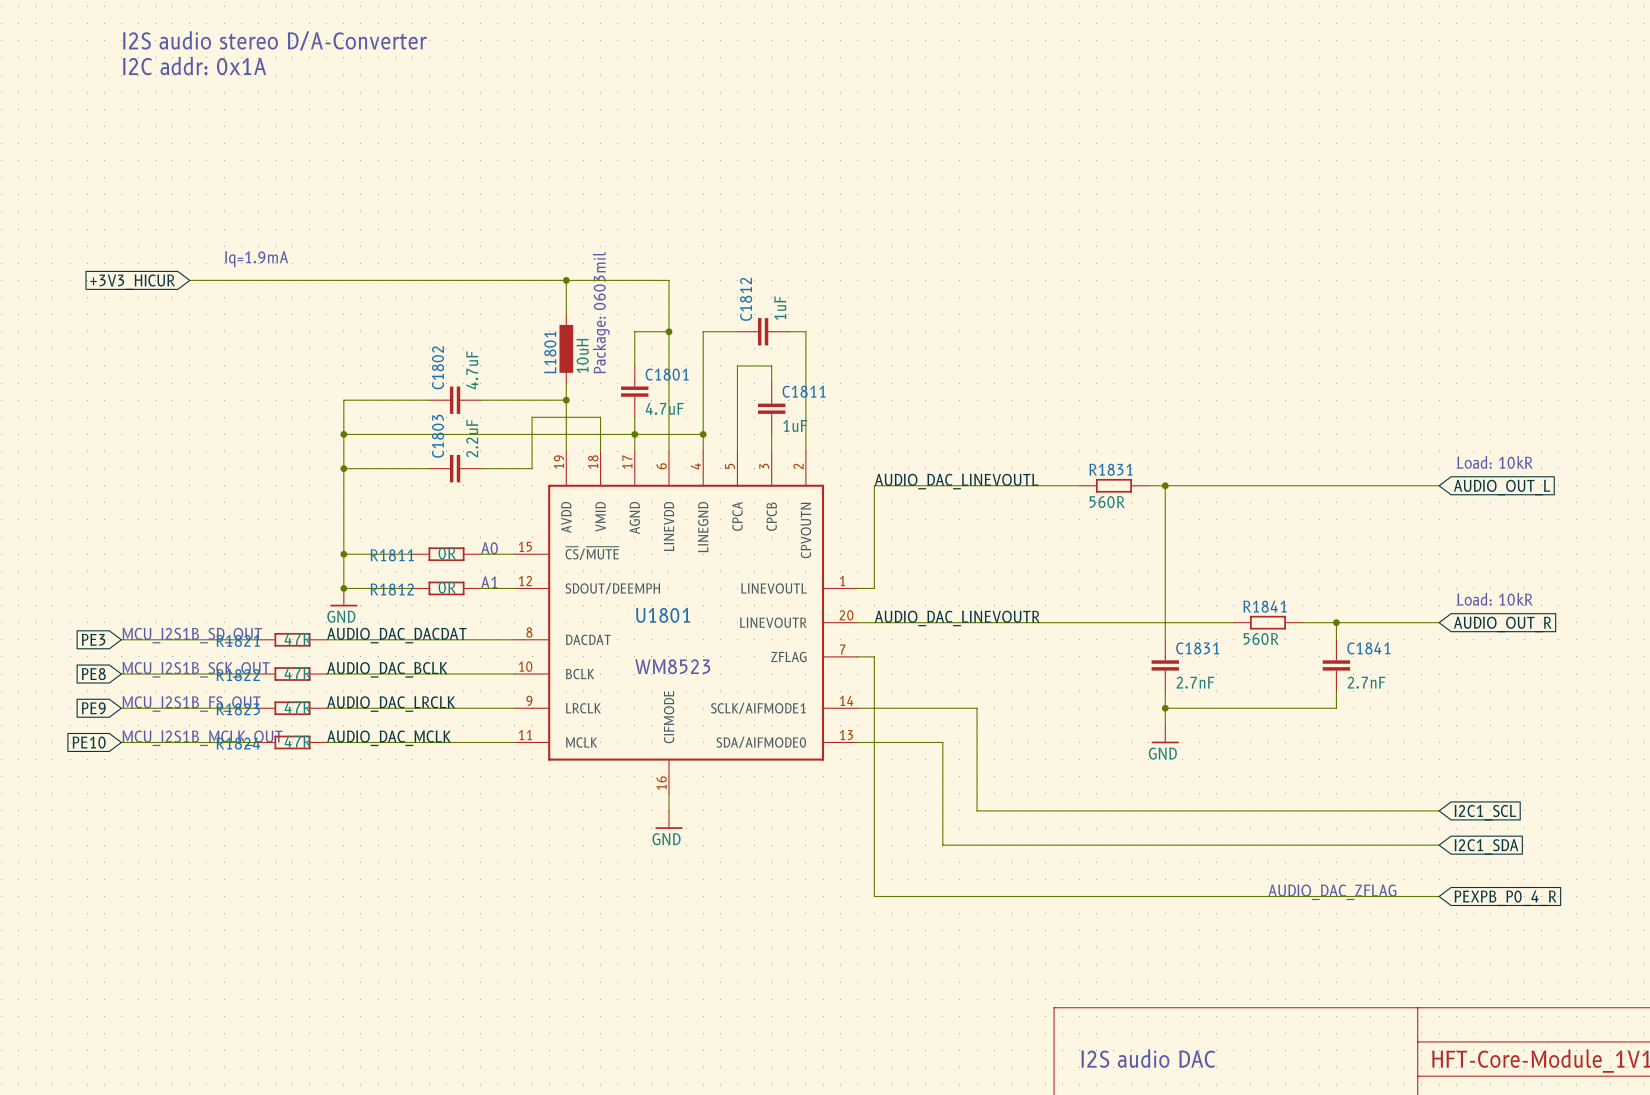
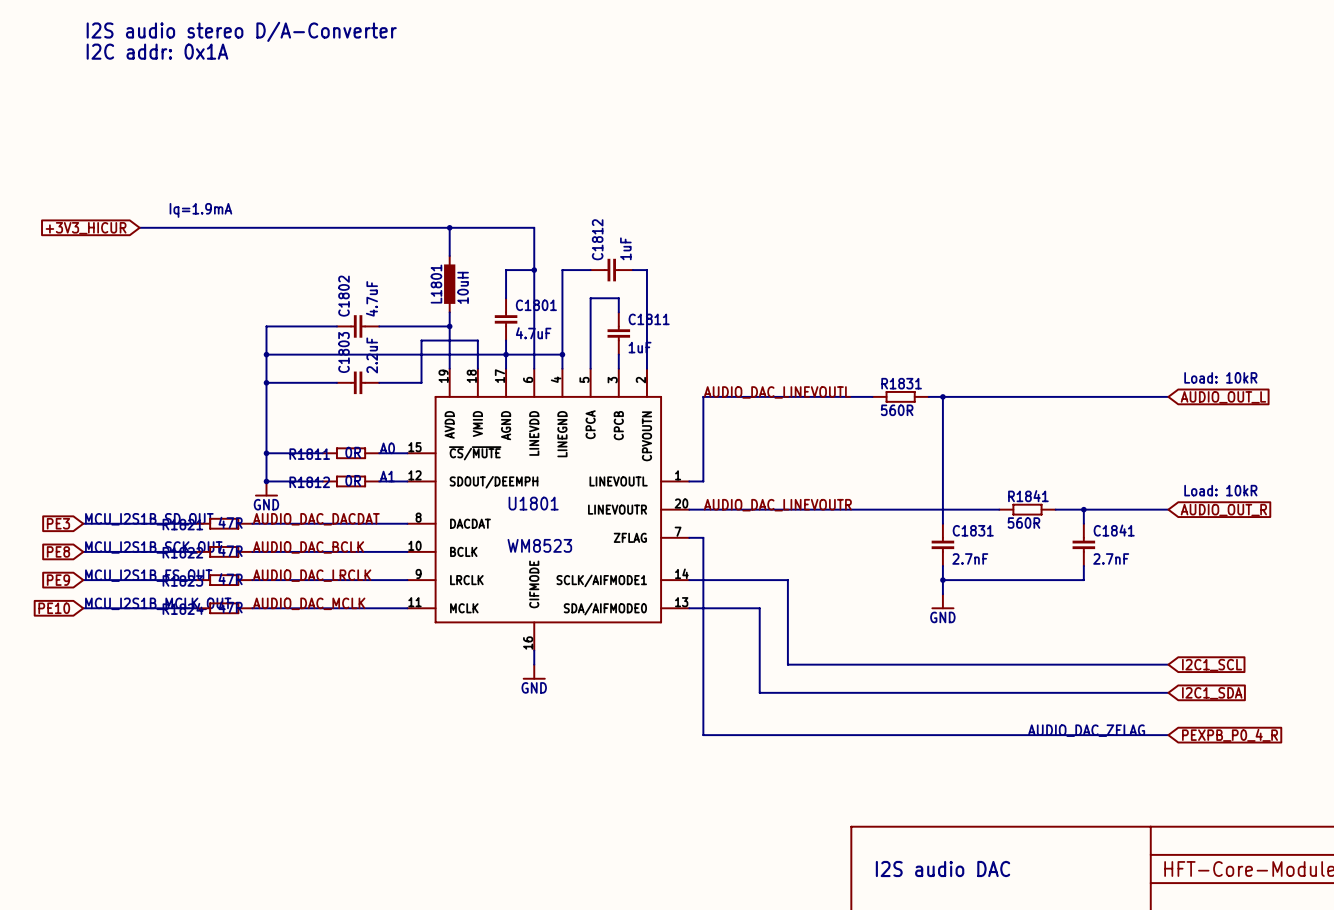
text: Package: 0603mil (601, 312) -> none

